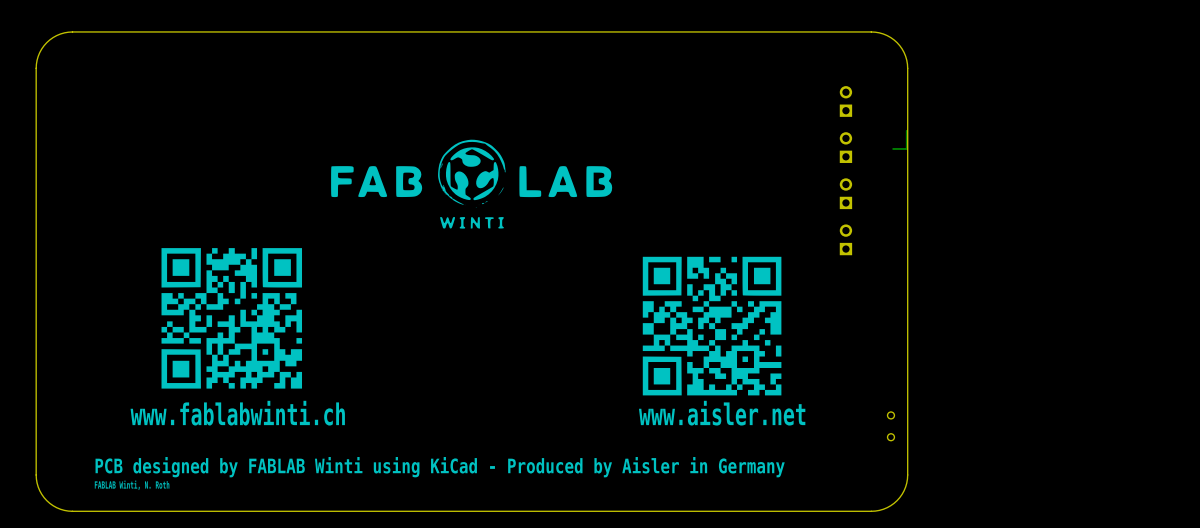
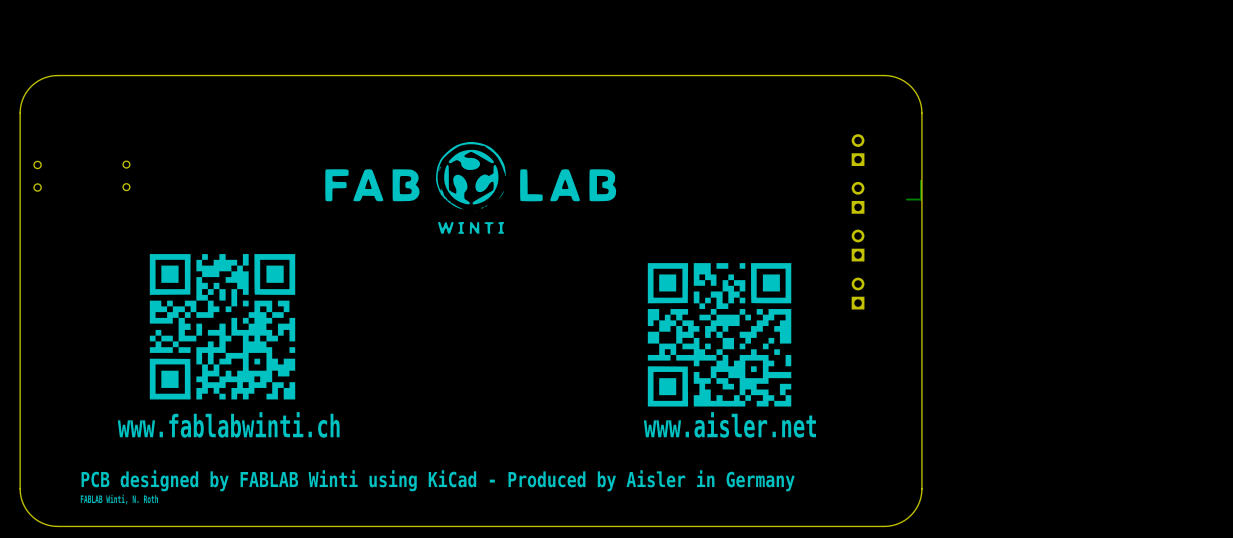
part: (845, 101) -> none
board edge: (907, 111) (907, 64) (904, 52) (890, 37) (871, 31) (68, 32) (49, 39) (38, 56) (36, 68) (36, 111) -> (921, 113) (918, 96) (910, 86) (896, 77) (884, 75) (57, 75) (45, 77) (31, 86) (23, 96) (20, 113)
track: (906, 130) (906, 148) (893, 148) -> (920, 180) (920, 199) (906, 199)
part: none -> (37, 176)
part: none -> (126, 175)
part: none -> (858, 293)
part: (890, 426) -> none

